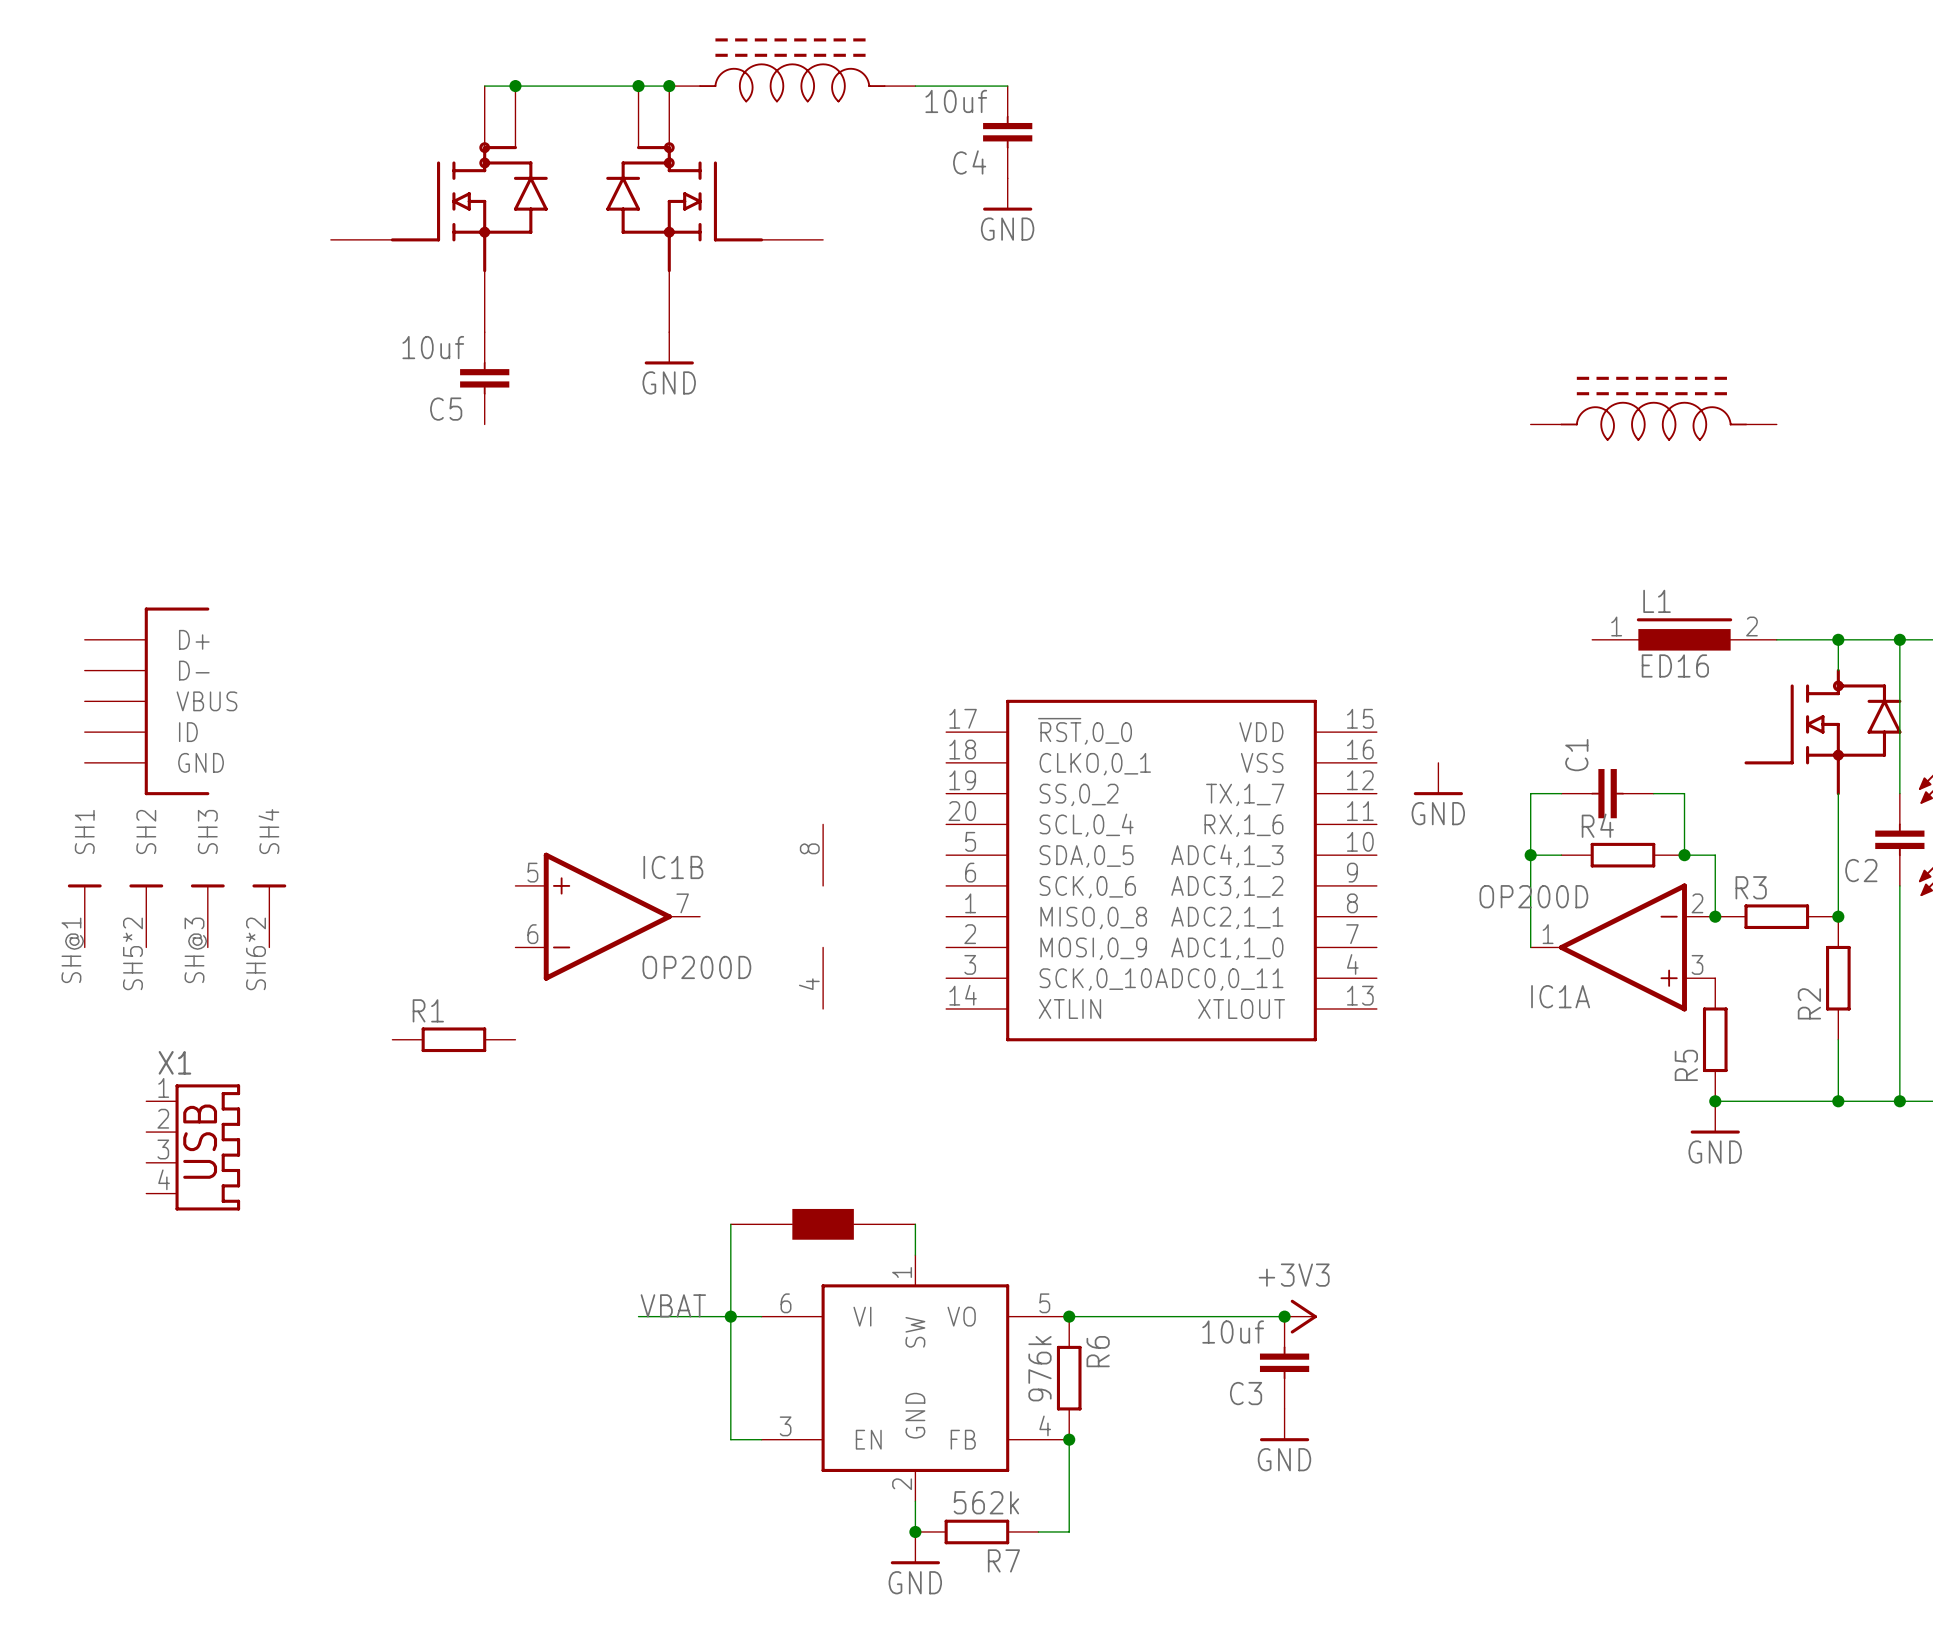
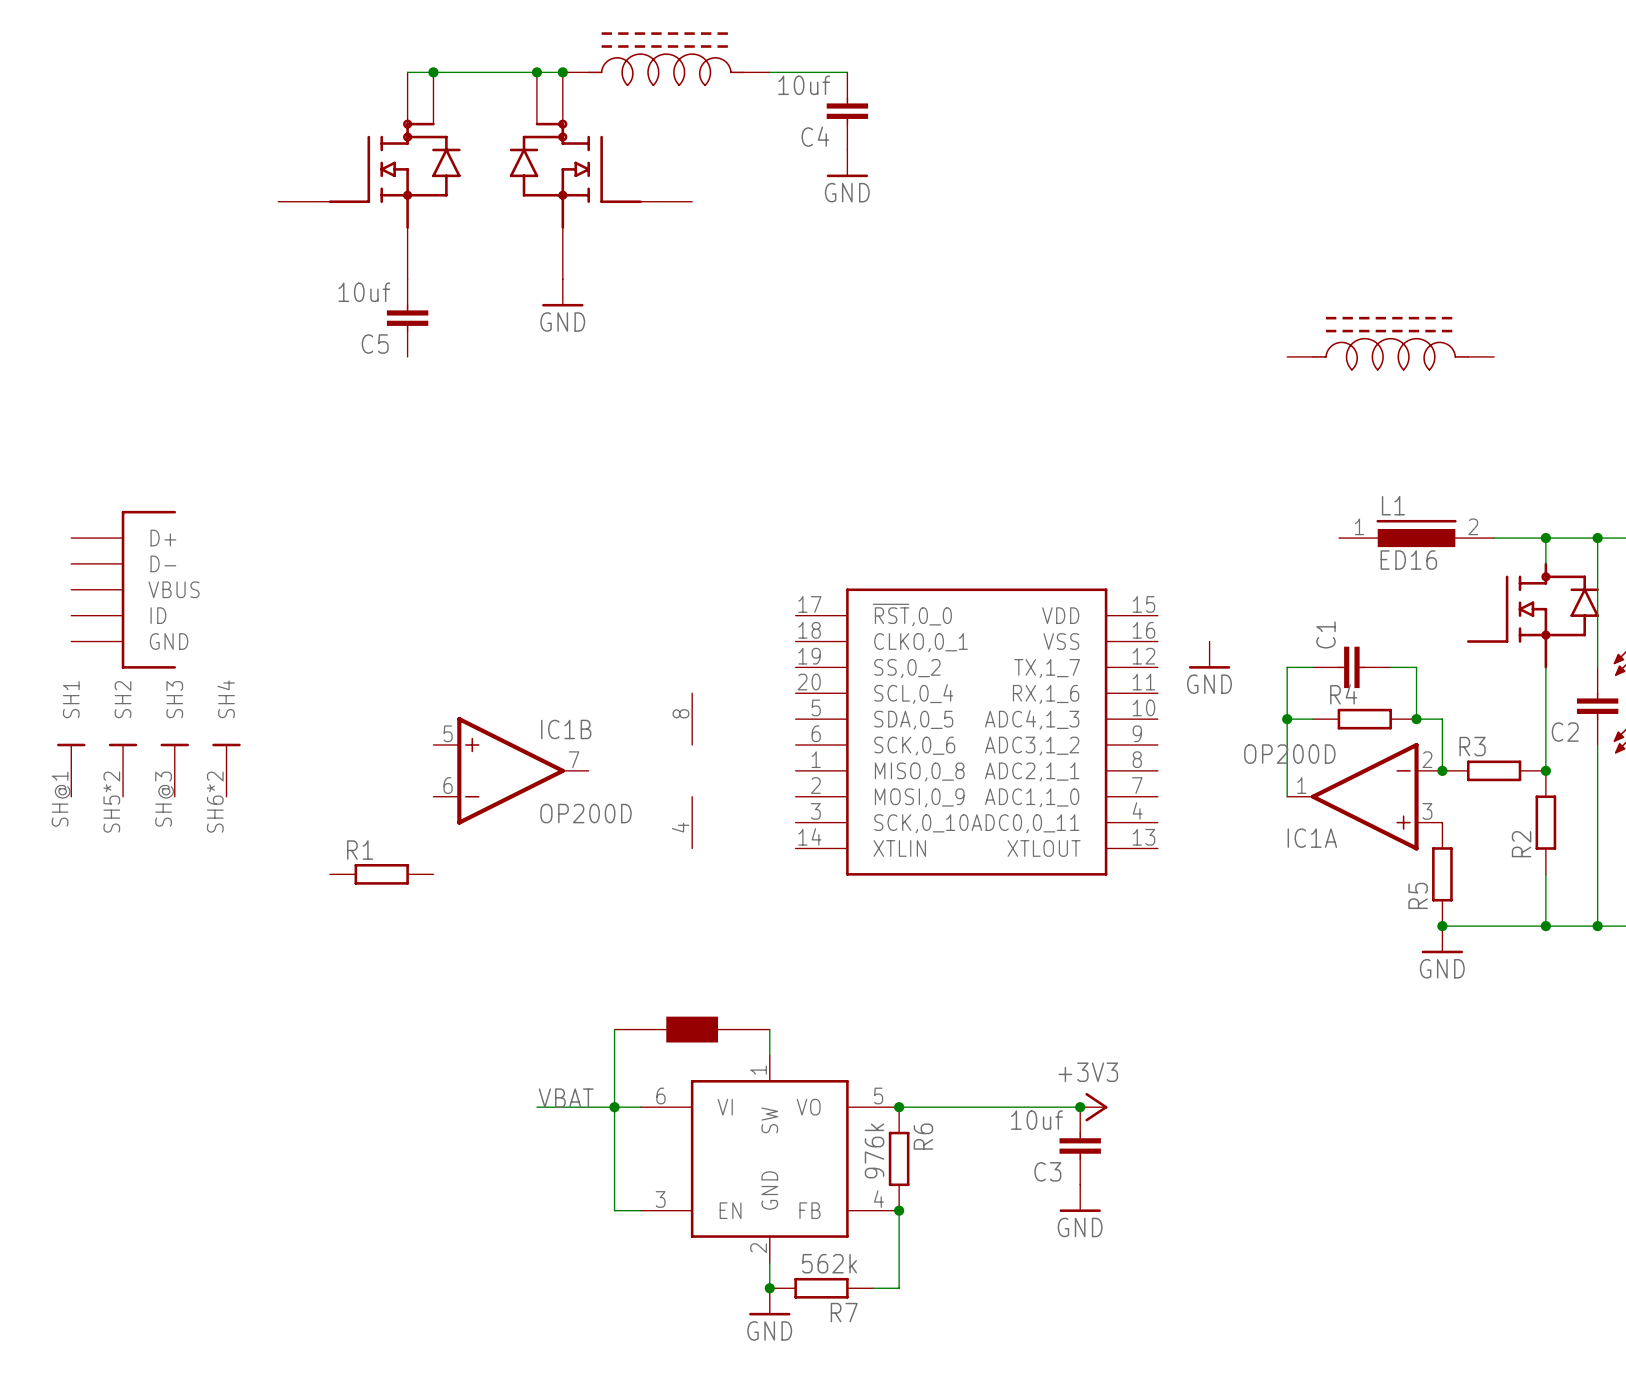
X1: (193, 1147) -> none

